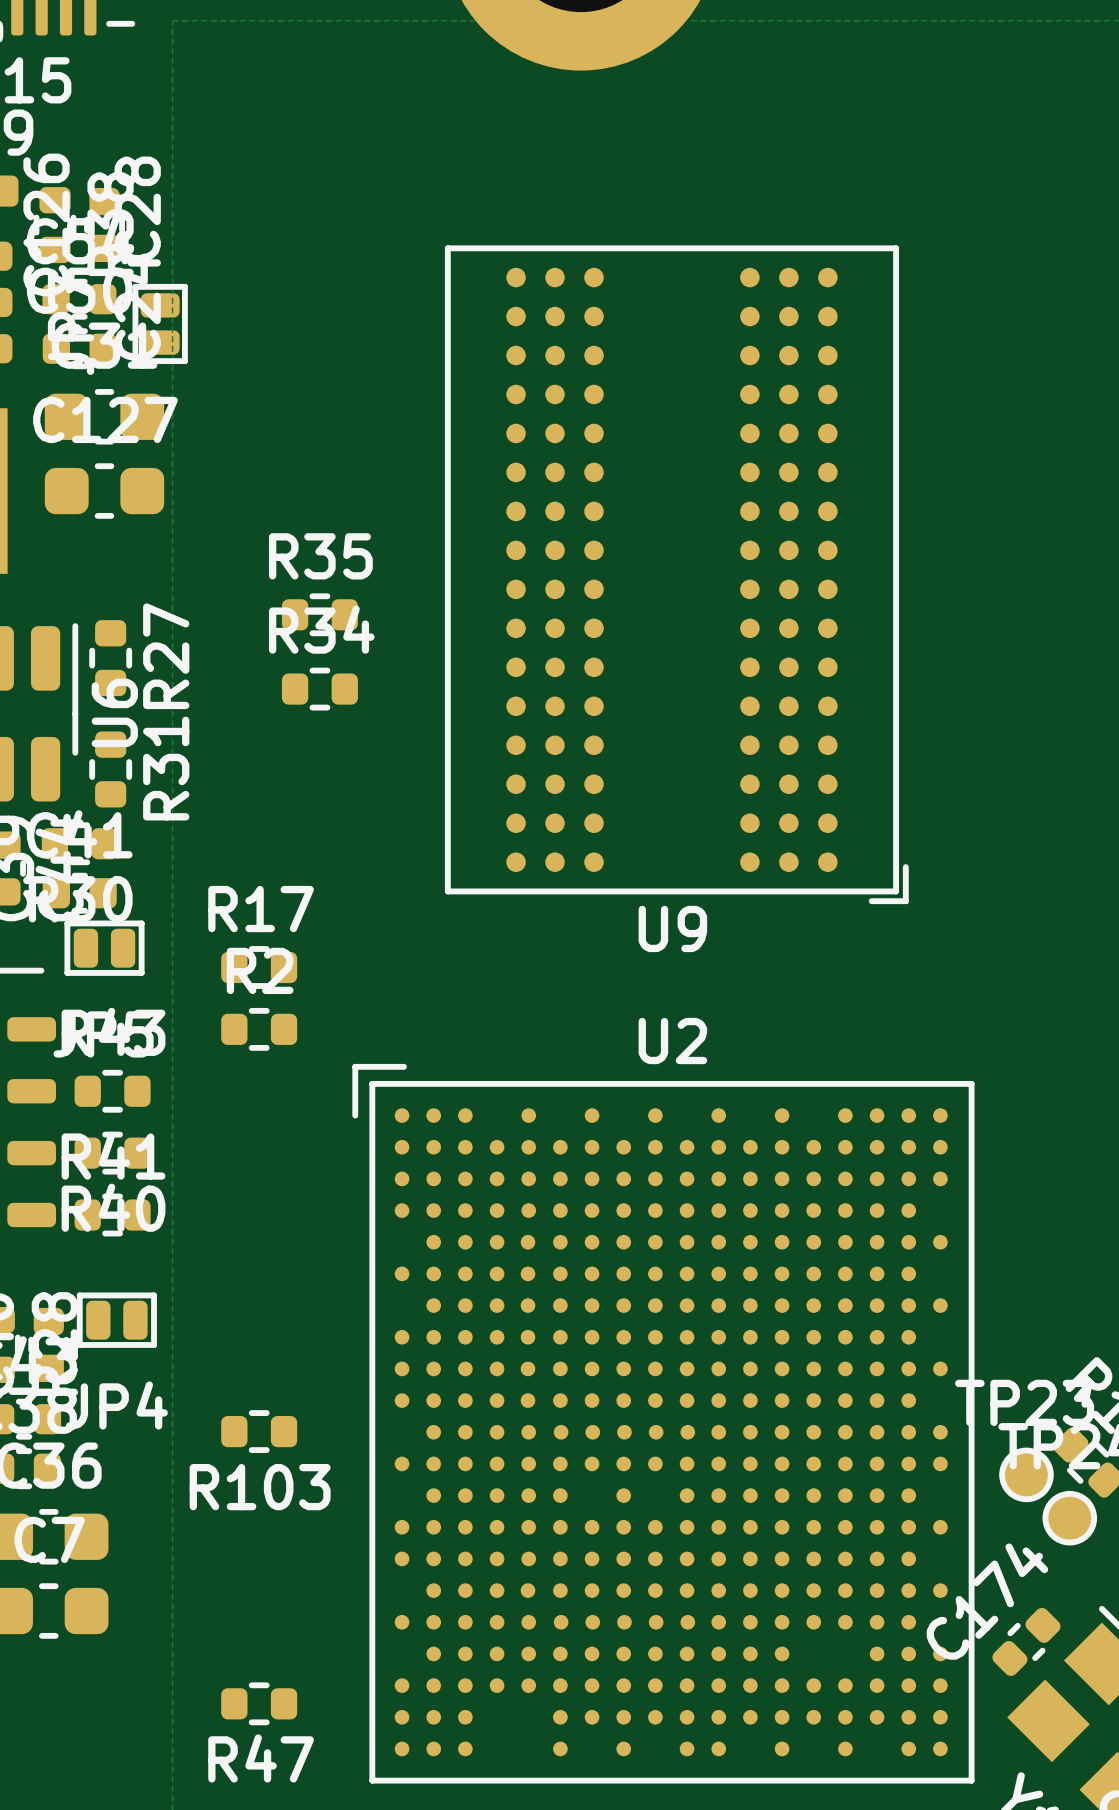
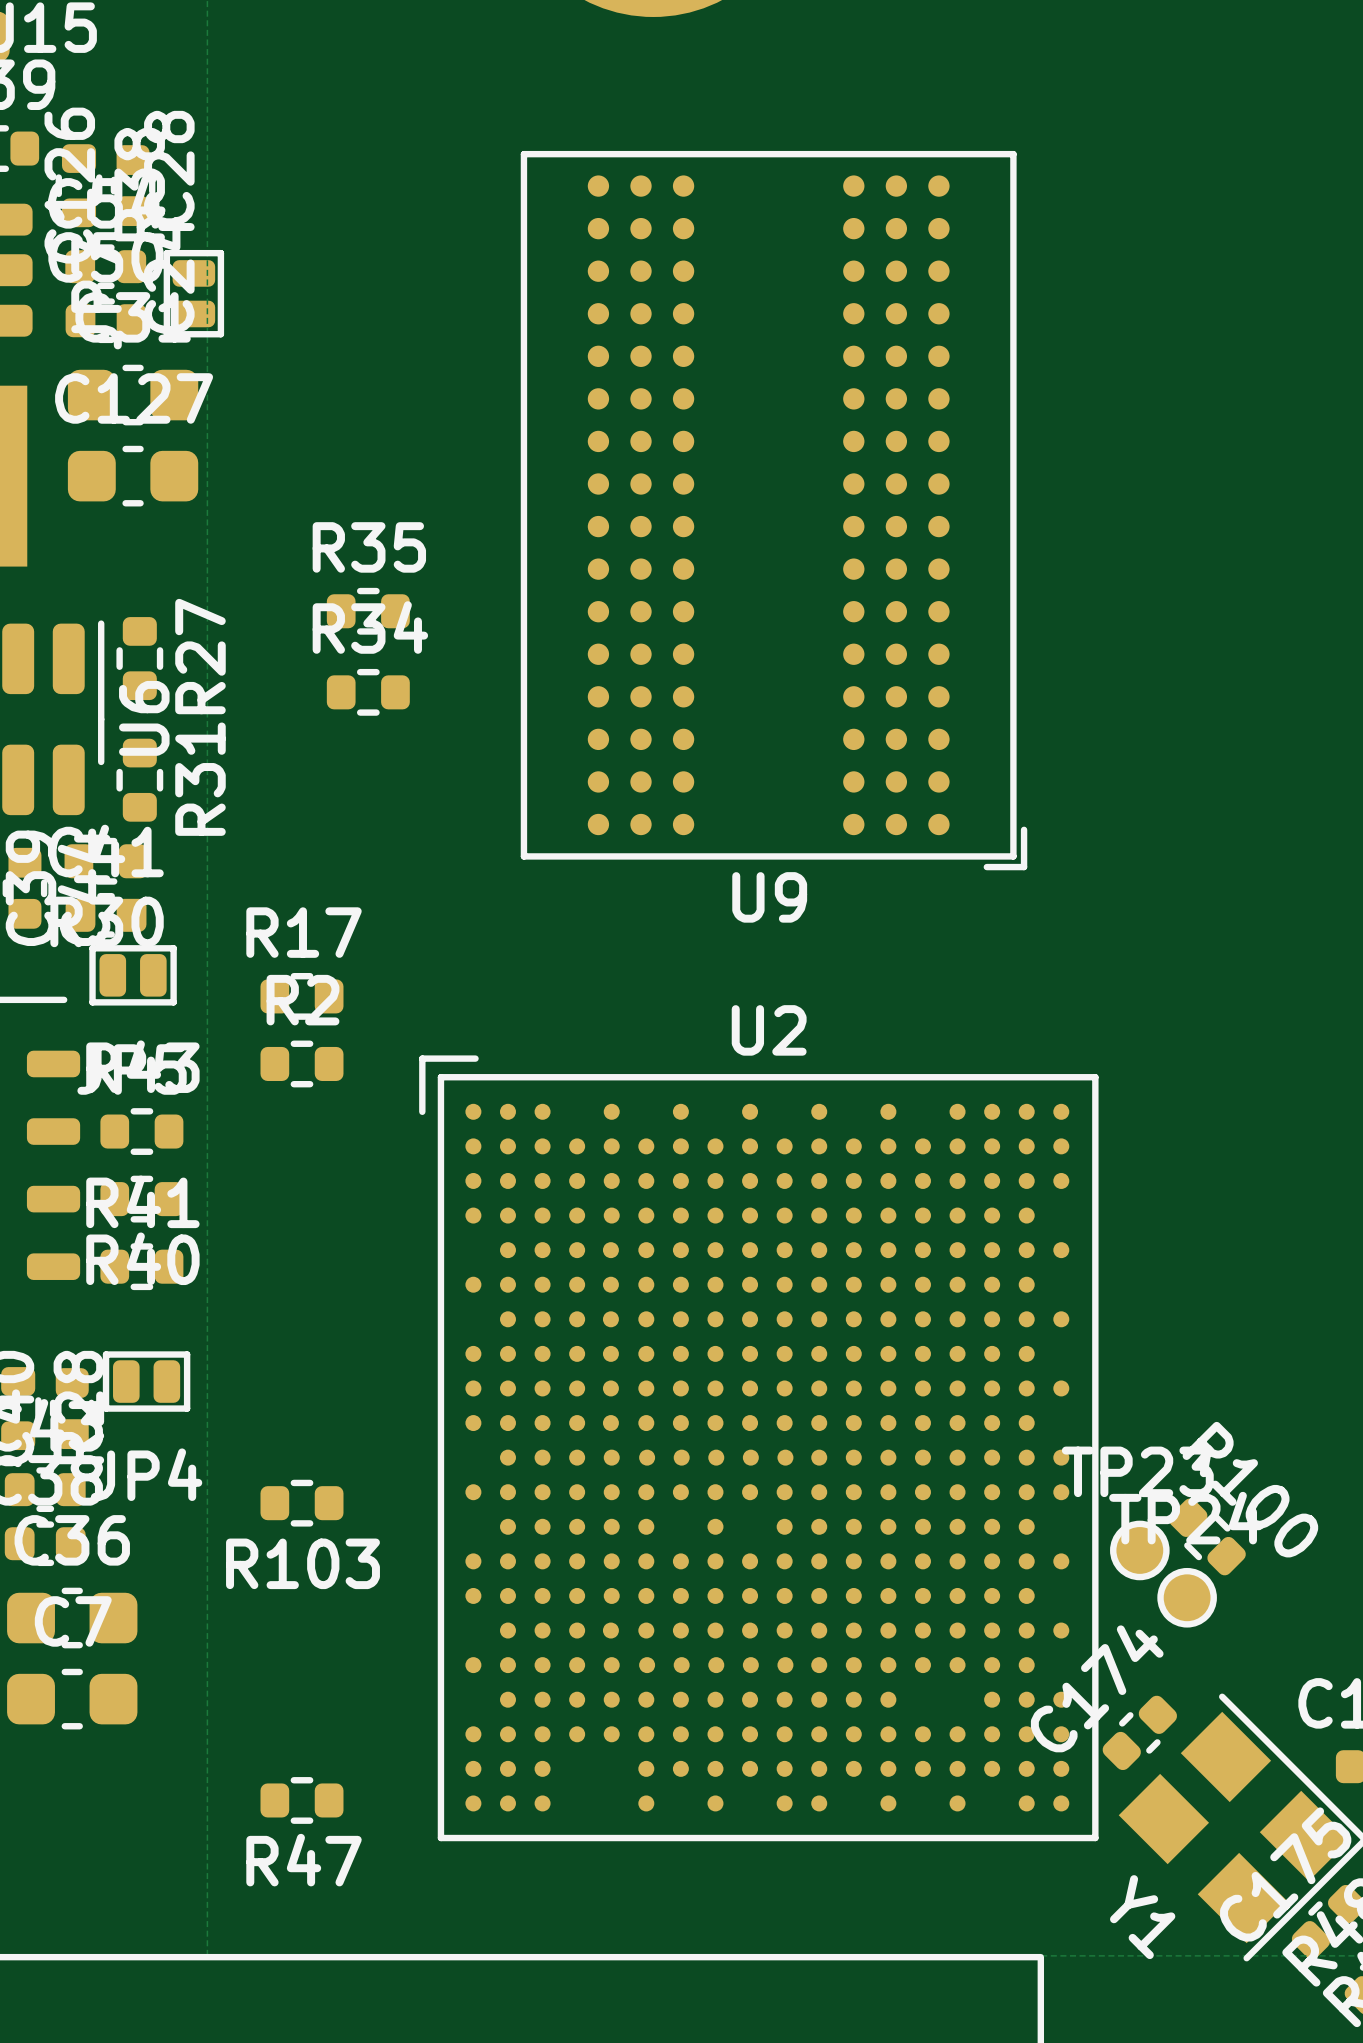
U9 position: (676, 574) -> (774, 510)
U2 position: (663, 1423) -> (758, 1448)

